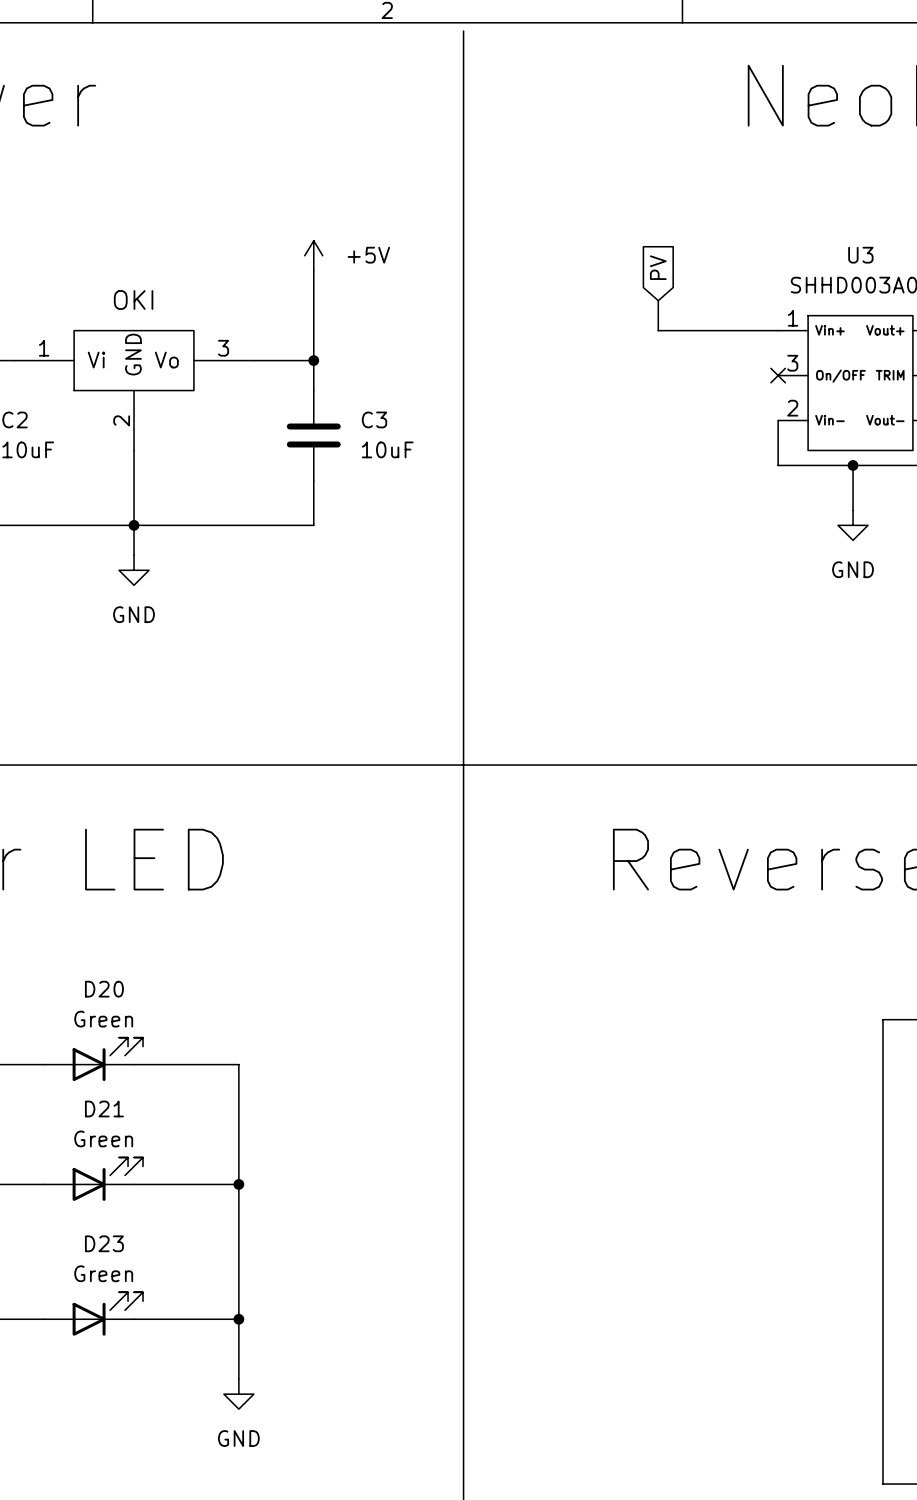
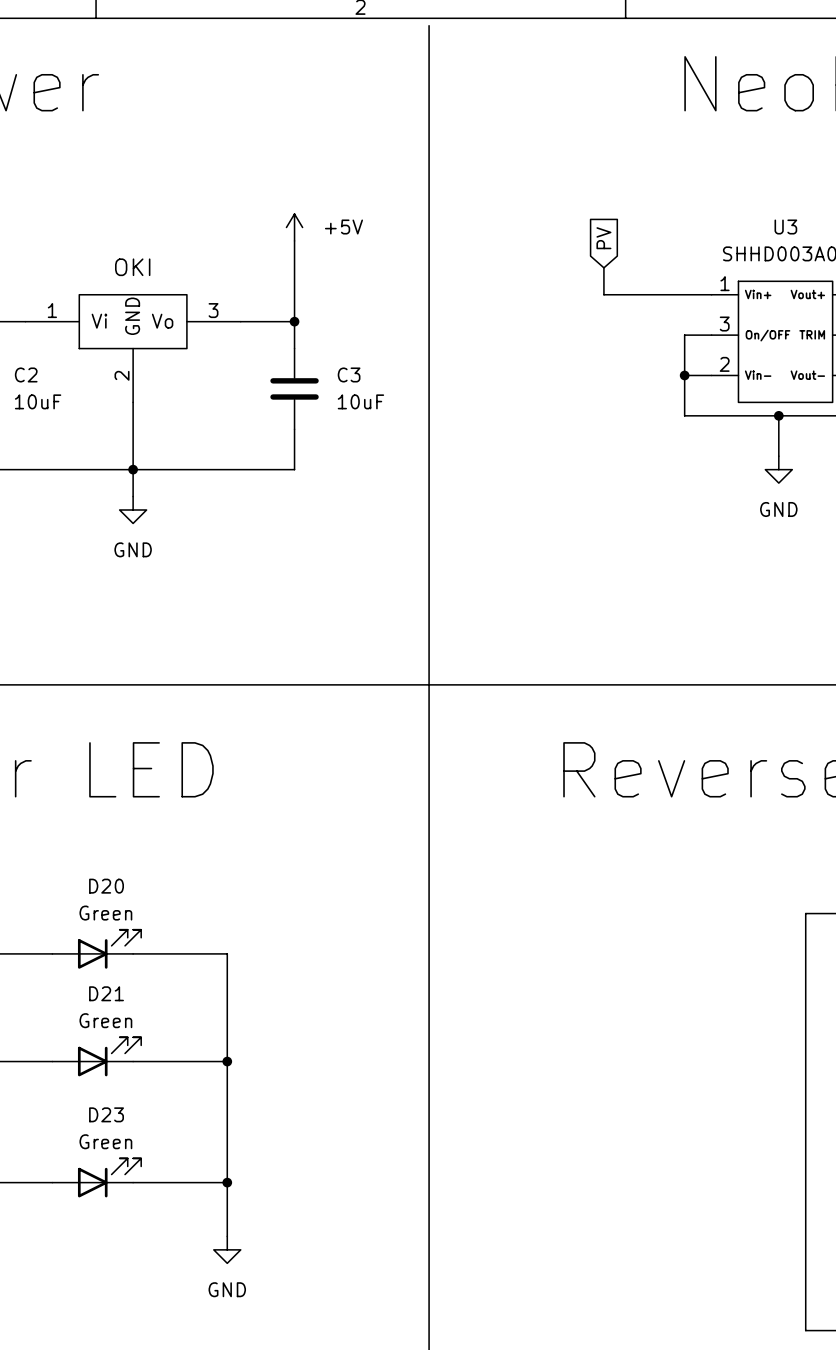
no-connect mark: (778, 375) -> none
wire: none -> (684, 375) (711, 375)
junction: none -> (684, 375)
wire: (778, 420) (778, 465) -> (711, 335) (684, 335) (684, 415) (711, 415)

